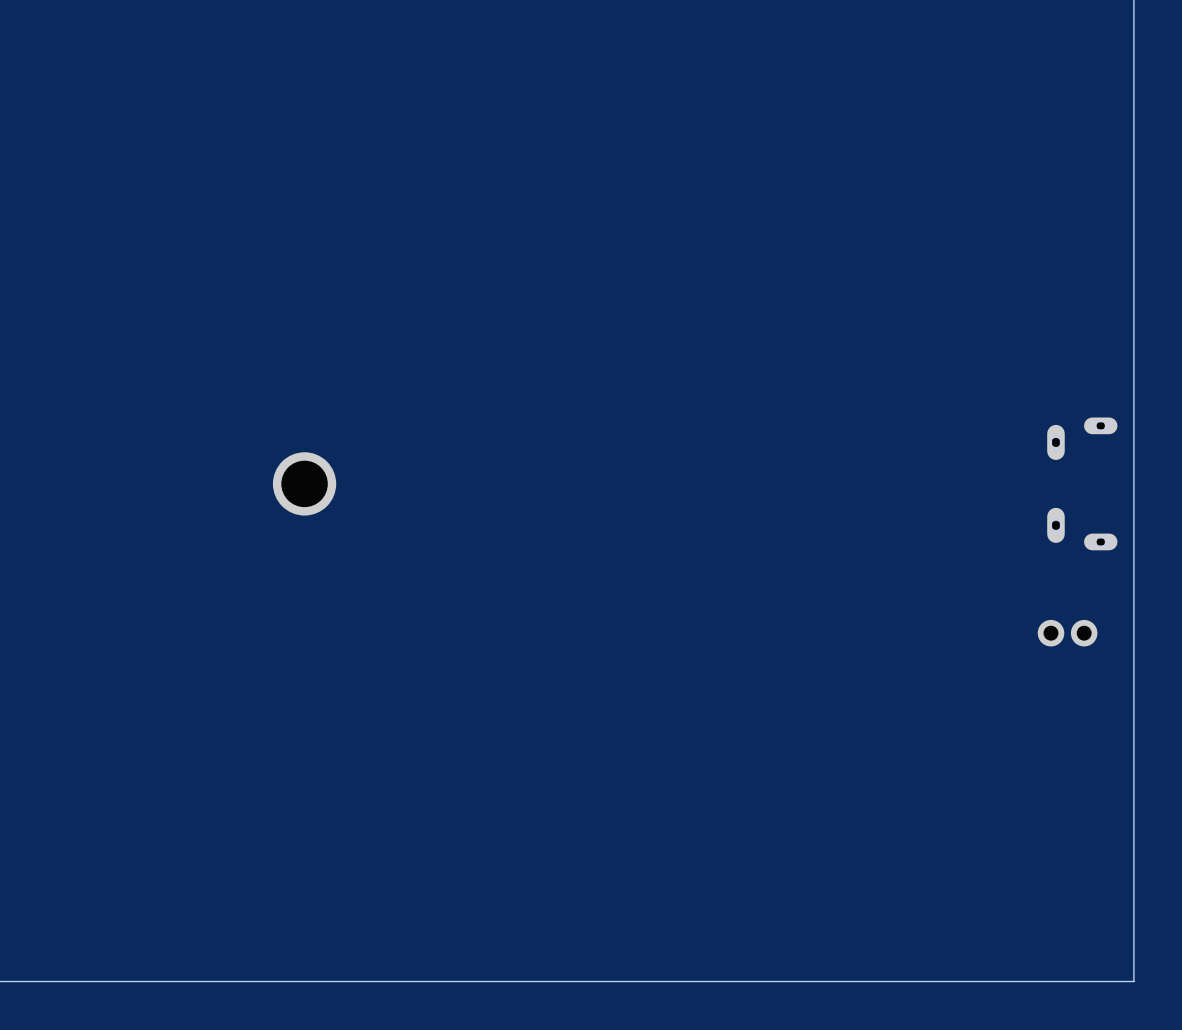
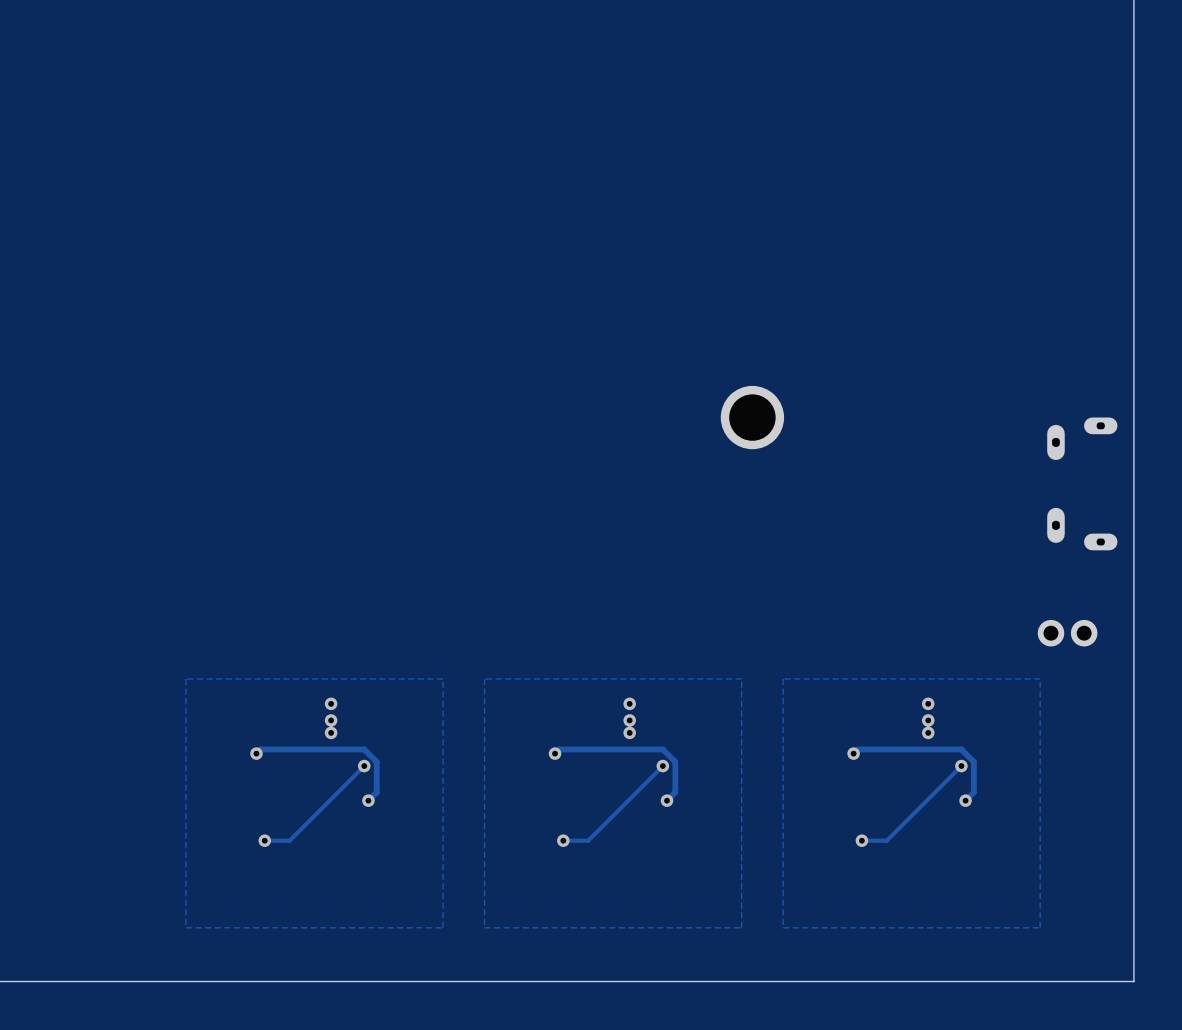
part: none -> (752, 417)
part: (304, 483) -> none
zone outline: none -> (443, 678) (443, 927) (185, 927) (185, 678) (443, 678)
zone outline: none -> (741, 678) (484, 678) (484, 927) (741, 927) (741, 678)
zone outline: none -> (1040, 678) (783, 678) (783, 927) (1040, 927) (1040, 678)
via: none -> (331, 703)
via: none -> (629, 703)
via: none -> (928, 703)
via: none -> (331, 720)
via: none -> (629, 720)
via: none -> (928, 720)
via: none -> (331, 732)
via: none -> (629, 732)
via: none -> (928, 732)
track: none -> (256, 753) (260, 749) (364, 749) (376, 761) (376, 792) (368, 800)
via: none -> (256, 753)
track: none -> (555, 753) (559, 749) (662, 749) (675, 761) (675, 792) (667, 800)
via: none -> (555, 753)
track: none -> (853, 753) (857, 749) (961, 749) (973, 761) (973, 792) (965, 800)
via: none -> (853, 753)
track: none -> (364, 766) (289, 840) (264, 840)
via: none -> (364, 766)
track: none -> (662, 766) (588, 840) (563, 840)
via: none -> (662, 766)
track: none -> (961, 766) (886, 840) (861, 840)
via: none -> (961, 766)
via: none -> (368, 800)
via: none -> (667, 800)
via: none -> (965, 800)
via: none -> (264, 840)
via: none -> (563, 840)
via: none -> (861, 840)

